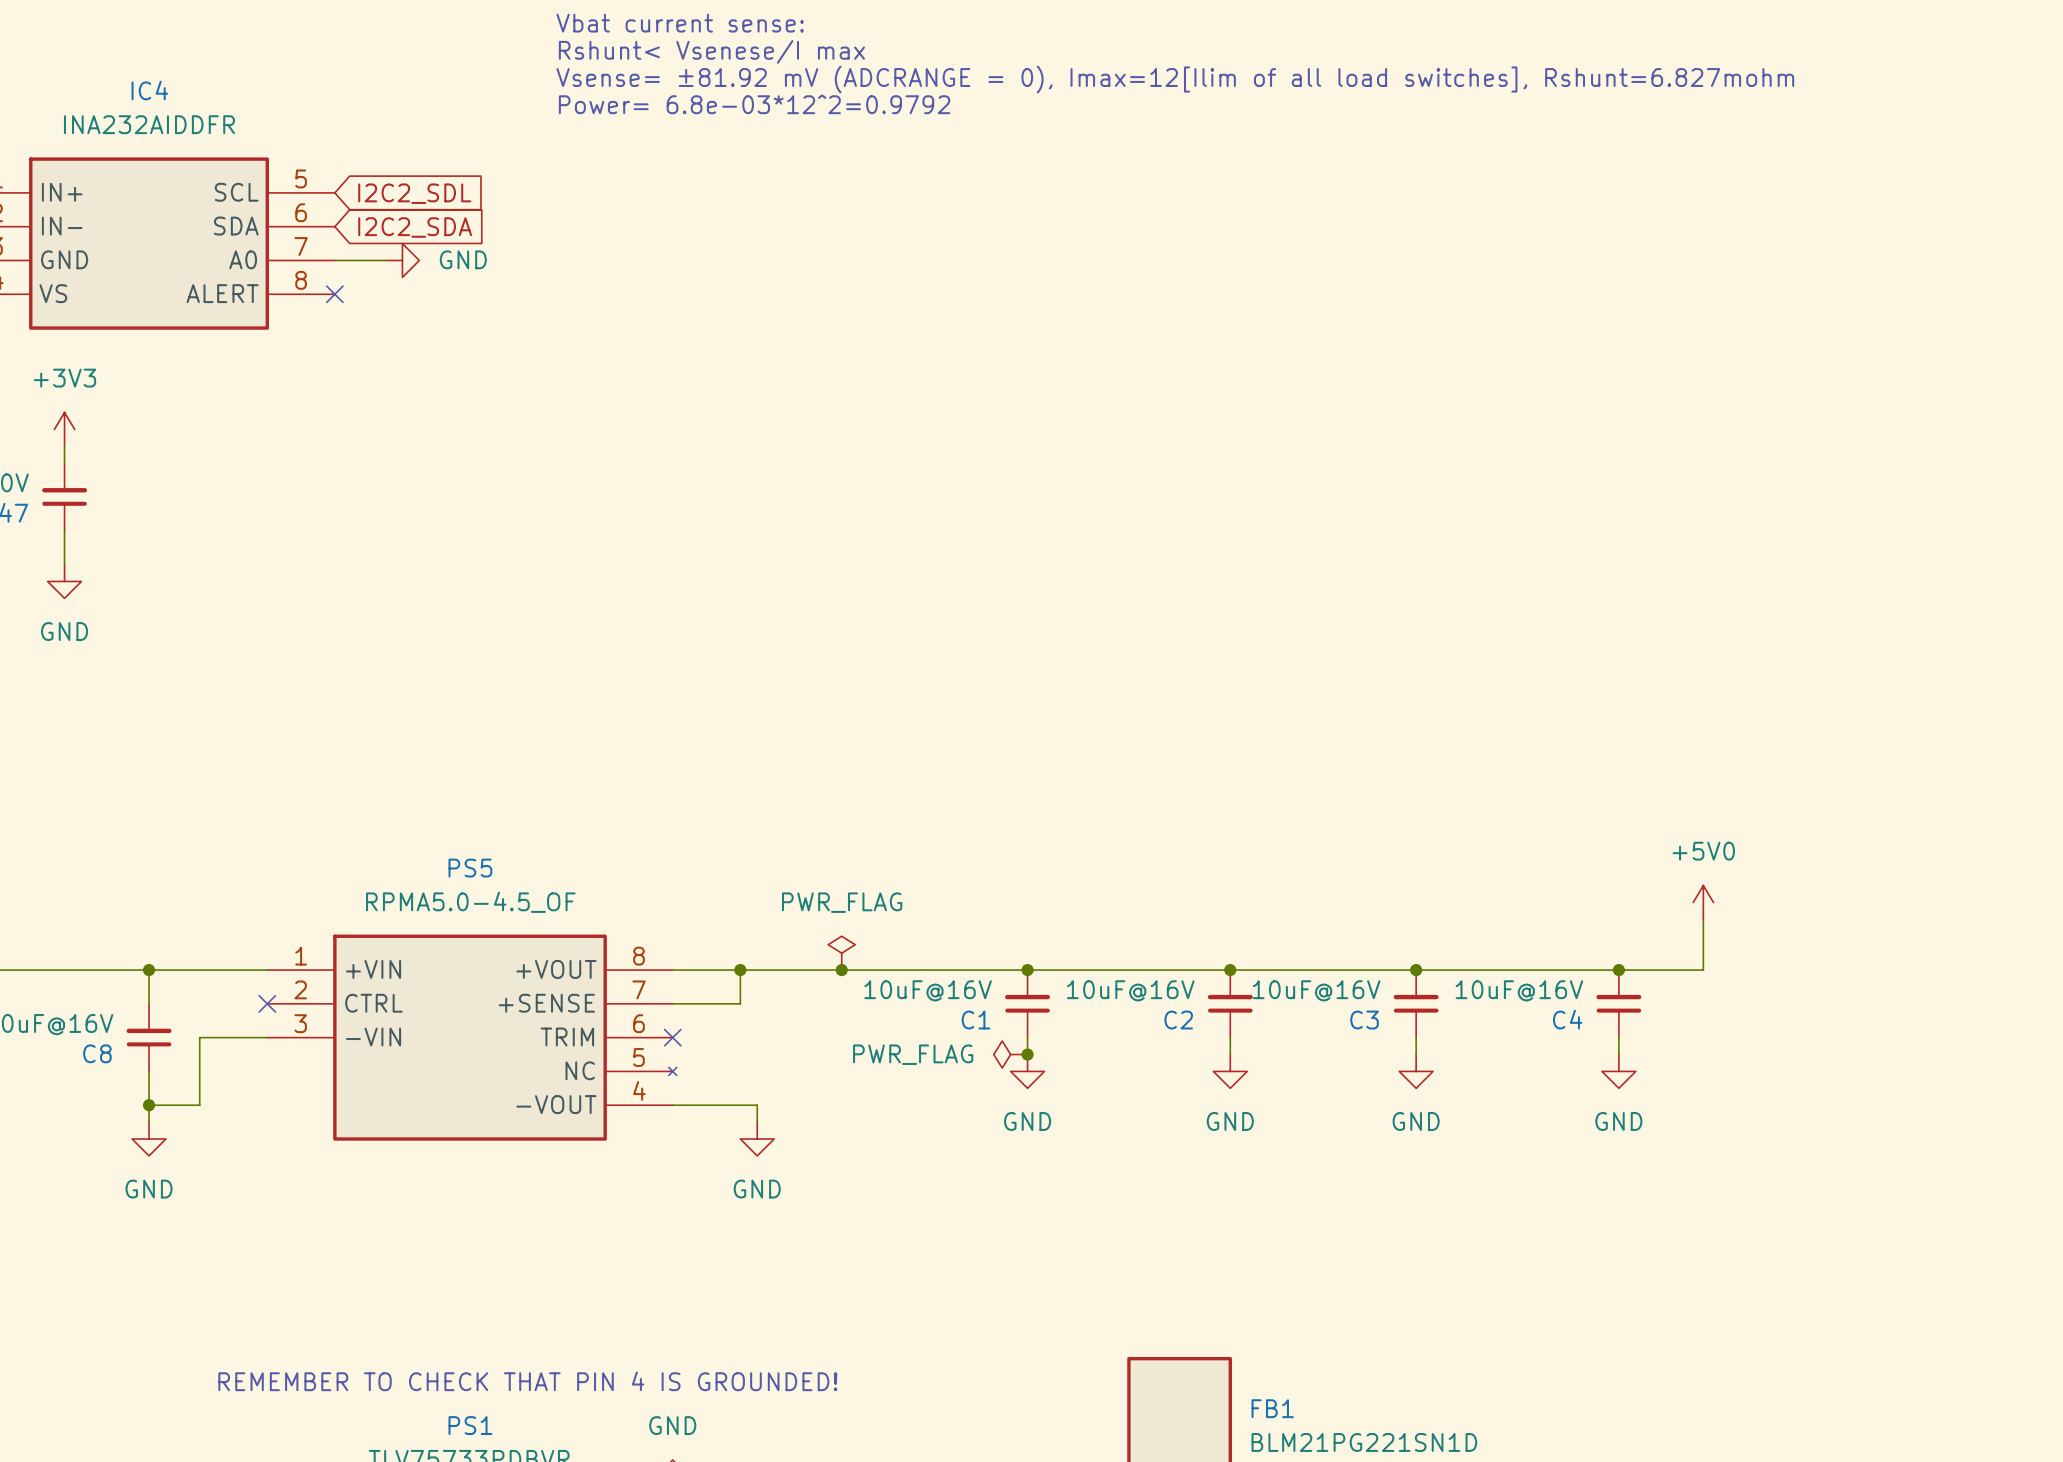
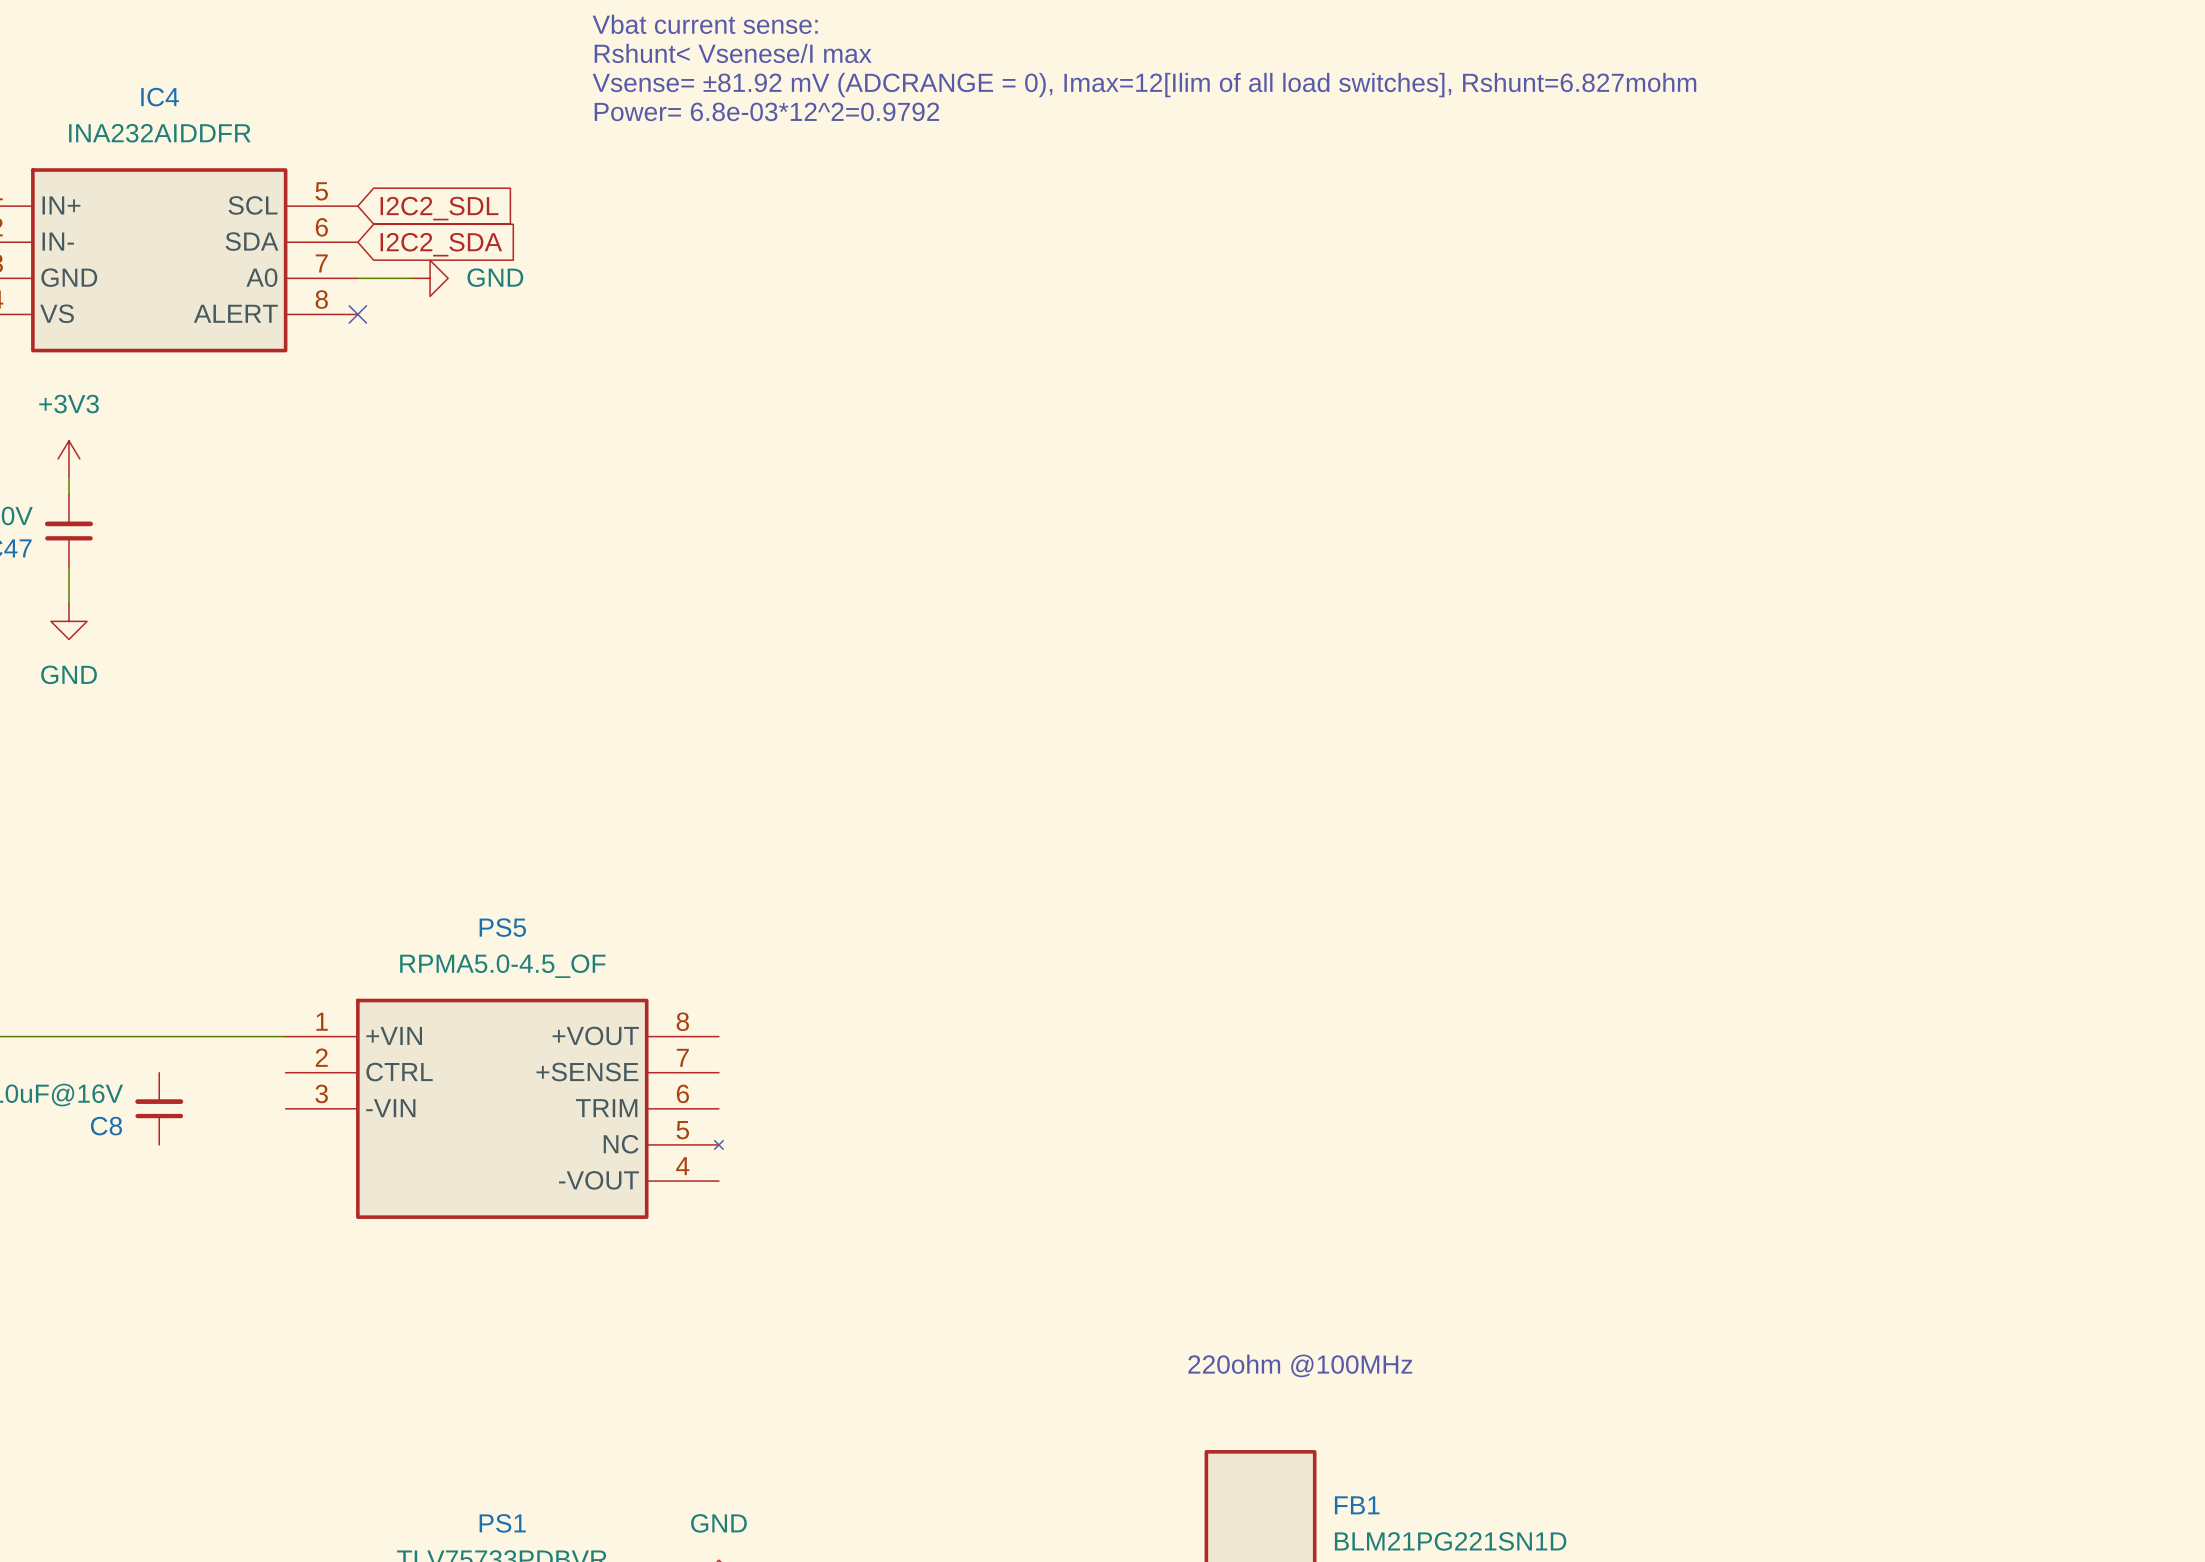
power symbol: +5V0 (1703, 902) -> none
wire: (1703, 919) (1703, 970) (672, 970) -> none
power symbol: PWR_FLAG (841, 953) -> none
wire: (149, 970) (149, 1003) -> none
junction: (149, 970) -> none
wire: (740, 970) (740, 1003) (672, 1003) -> none
junction: (740, 970) -> none
junction: (841, 970) -> none
junction: (1027, 970) -> none
junction: (1230, 970) -> none
junction: (1416, 970) -> none
junction: (1618, 970) -> none
no-connect mark: (267, 1003) -> none
C1: 10uF@16V (1027, 1003) -> none
C2: 10uF@16V (1230, 1003) -> none
C3: 10uF@16V (1416, 1003) -> none
C4: 10uF@16V (1618, 1003) -> none
wire: (267, 1037) (199, 1037) (199, 1105) (149, 1105) -> none
no-connect mark: (672, 1037) -> none
wire: (1027, 1037) (1027, 1054) -> none
wire: (1230, 1037) (1230, 1054) -> none
wire: (1416, 1037) (1416, 1054) -> none
wire: (1618, 1037) (1618, 1054) -> none
power symbol: PWR_FLAG (1010, 1054) -> none
junction: (1027, 1054) -> none
wire: (149, 1071) (149, 1122) -> none
power symbol: GND (1027, 1071) -> none
power symbol: GND (1230, 1071) -> none
power symbol: GND (1416, 1071) -> none
power symbol: GND (1618, 1071) -> none
junction: (149, 1105) -> none
wire: (672, 1105) (757, 1105) (757, 1122) -> none
power symbol: GND (149, 1139) -> none
power symbol: GND (757, 1139) -> none
text: none -> 220ohm @100MHz (1300, 1365)
text: REMEMBER TO CHECK THAT PIN 4 IS GROUNDED! (527, 1381) -> none

